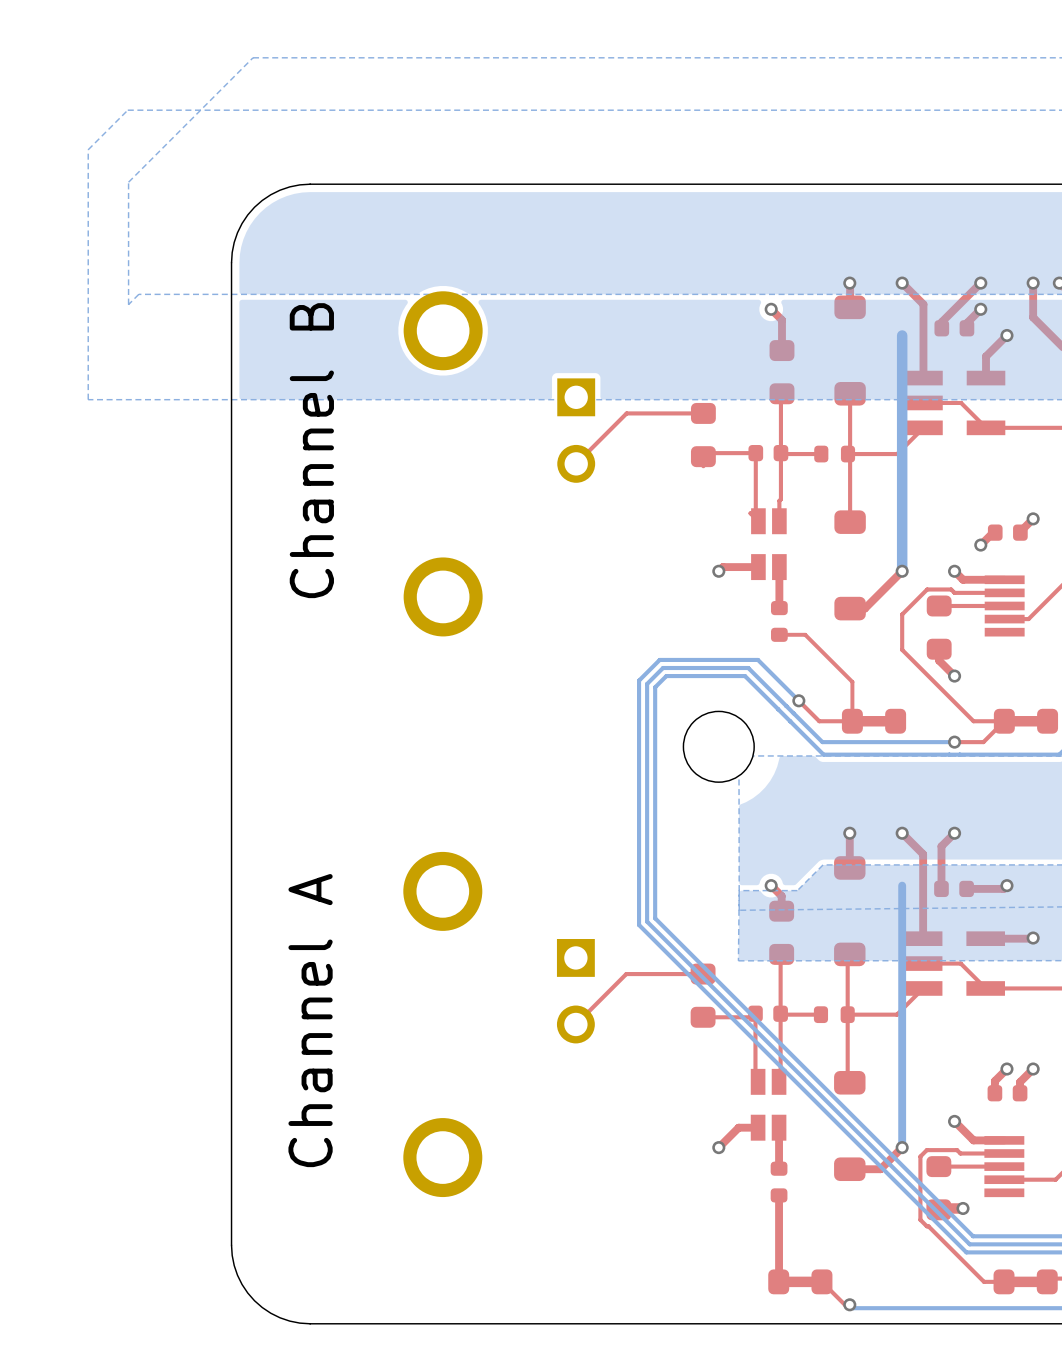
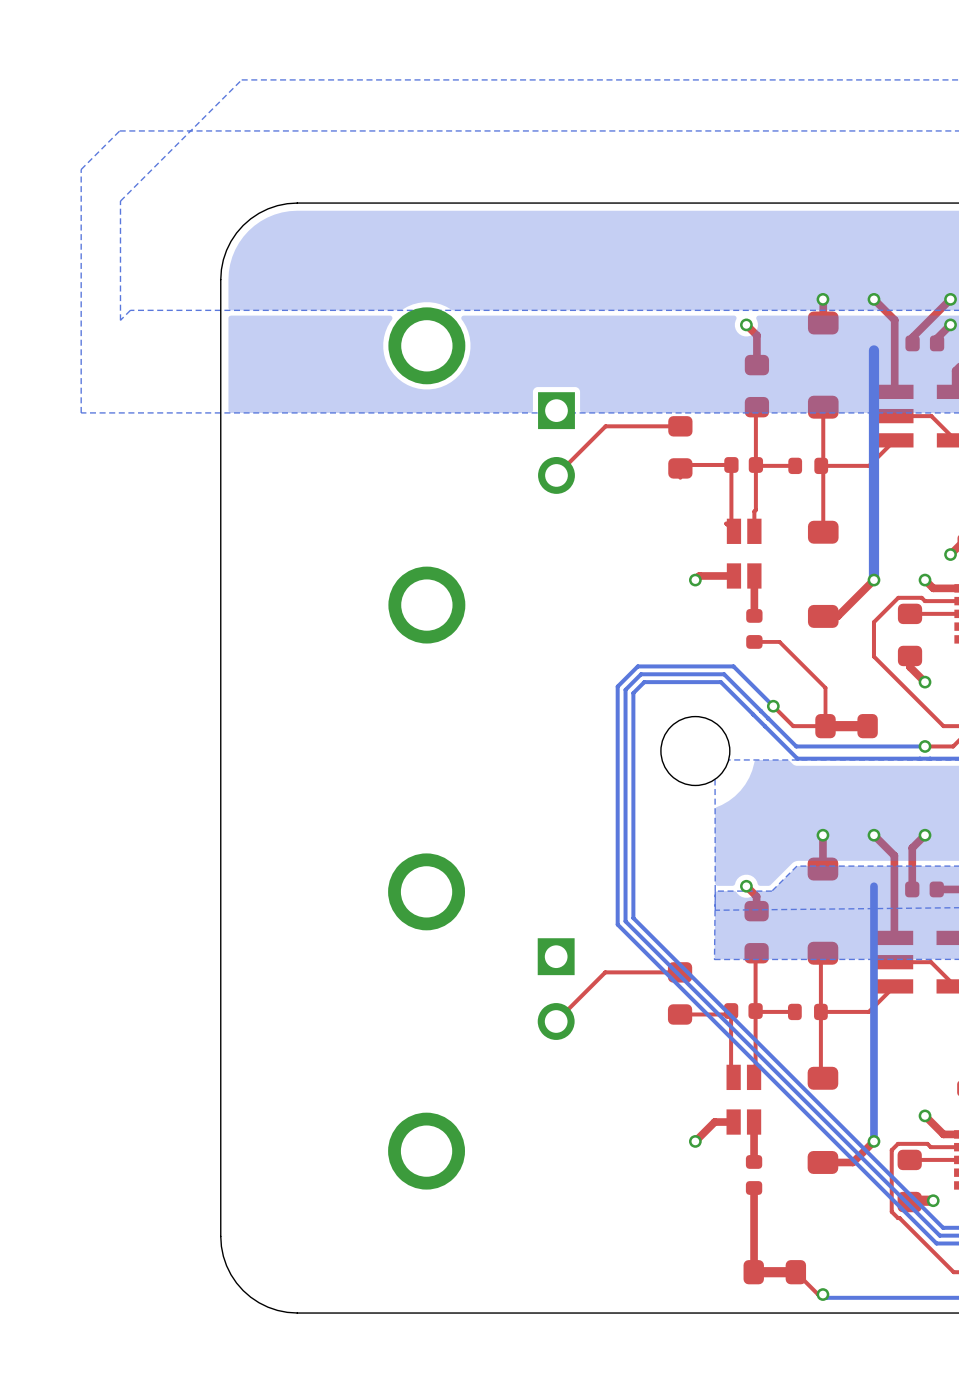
text: Channel B (311, 450) -> none
text: Channel A (310, 1020) -> none

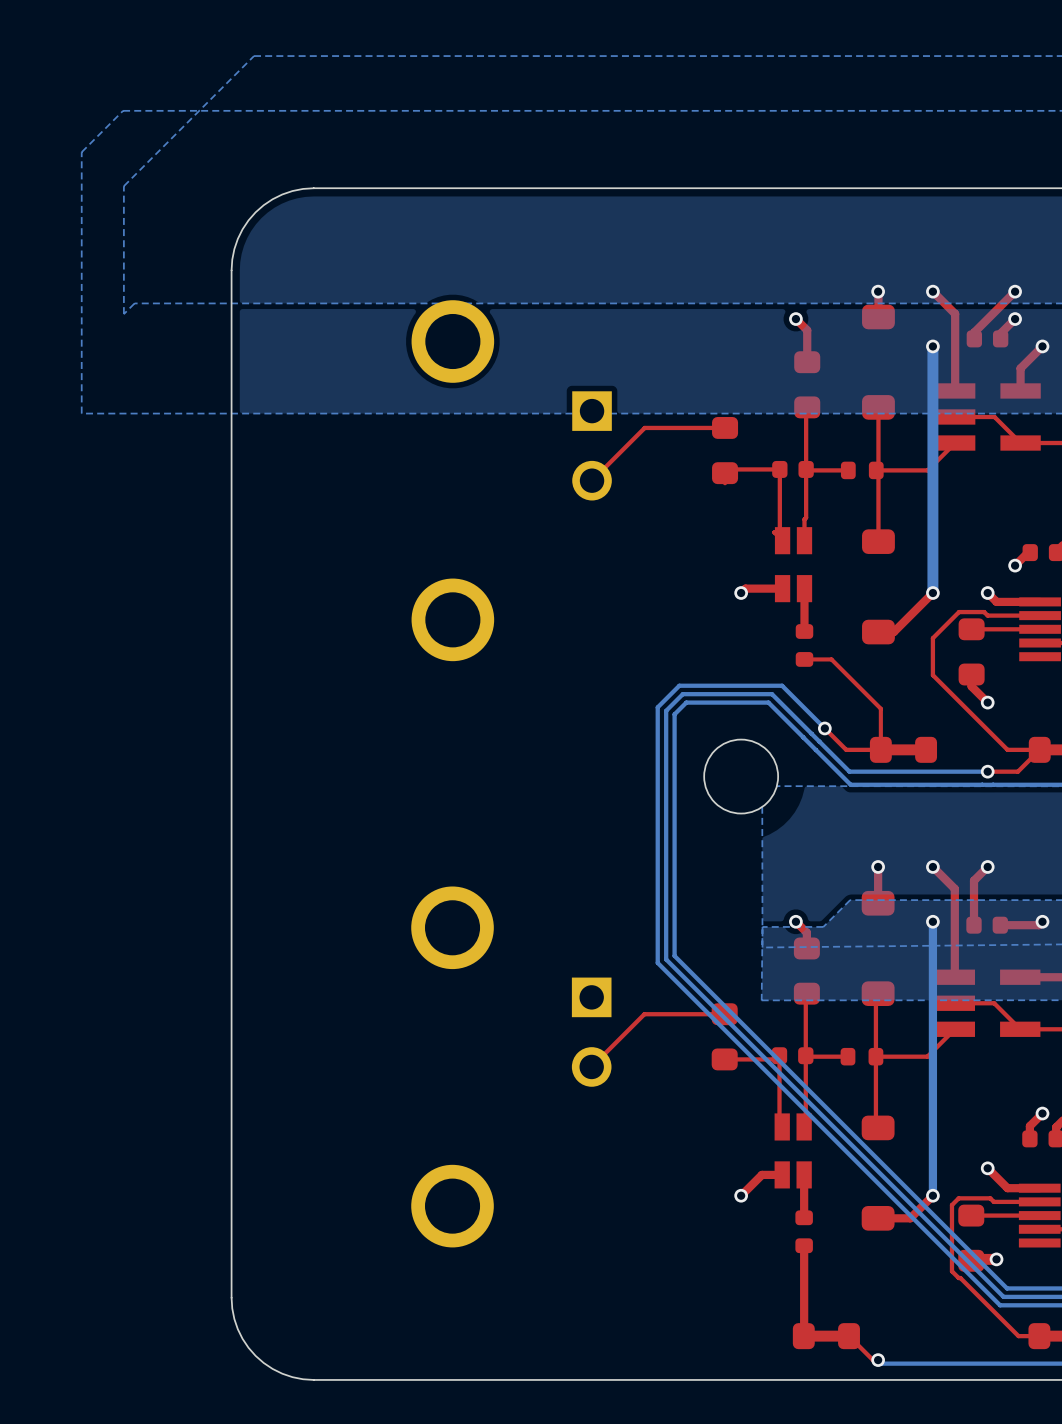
via: none -> (932, 346)
via: none -> (932, 921)

